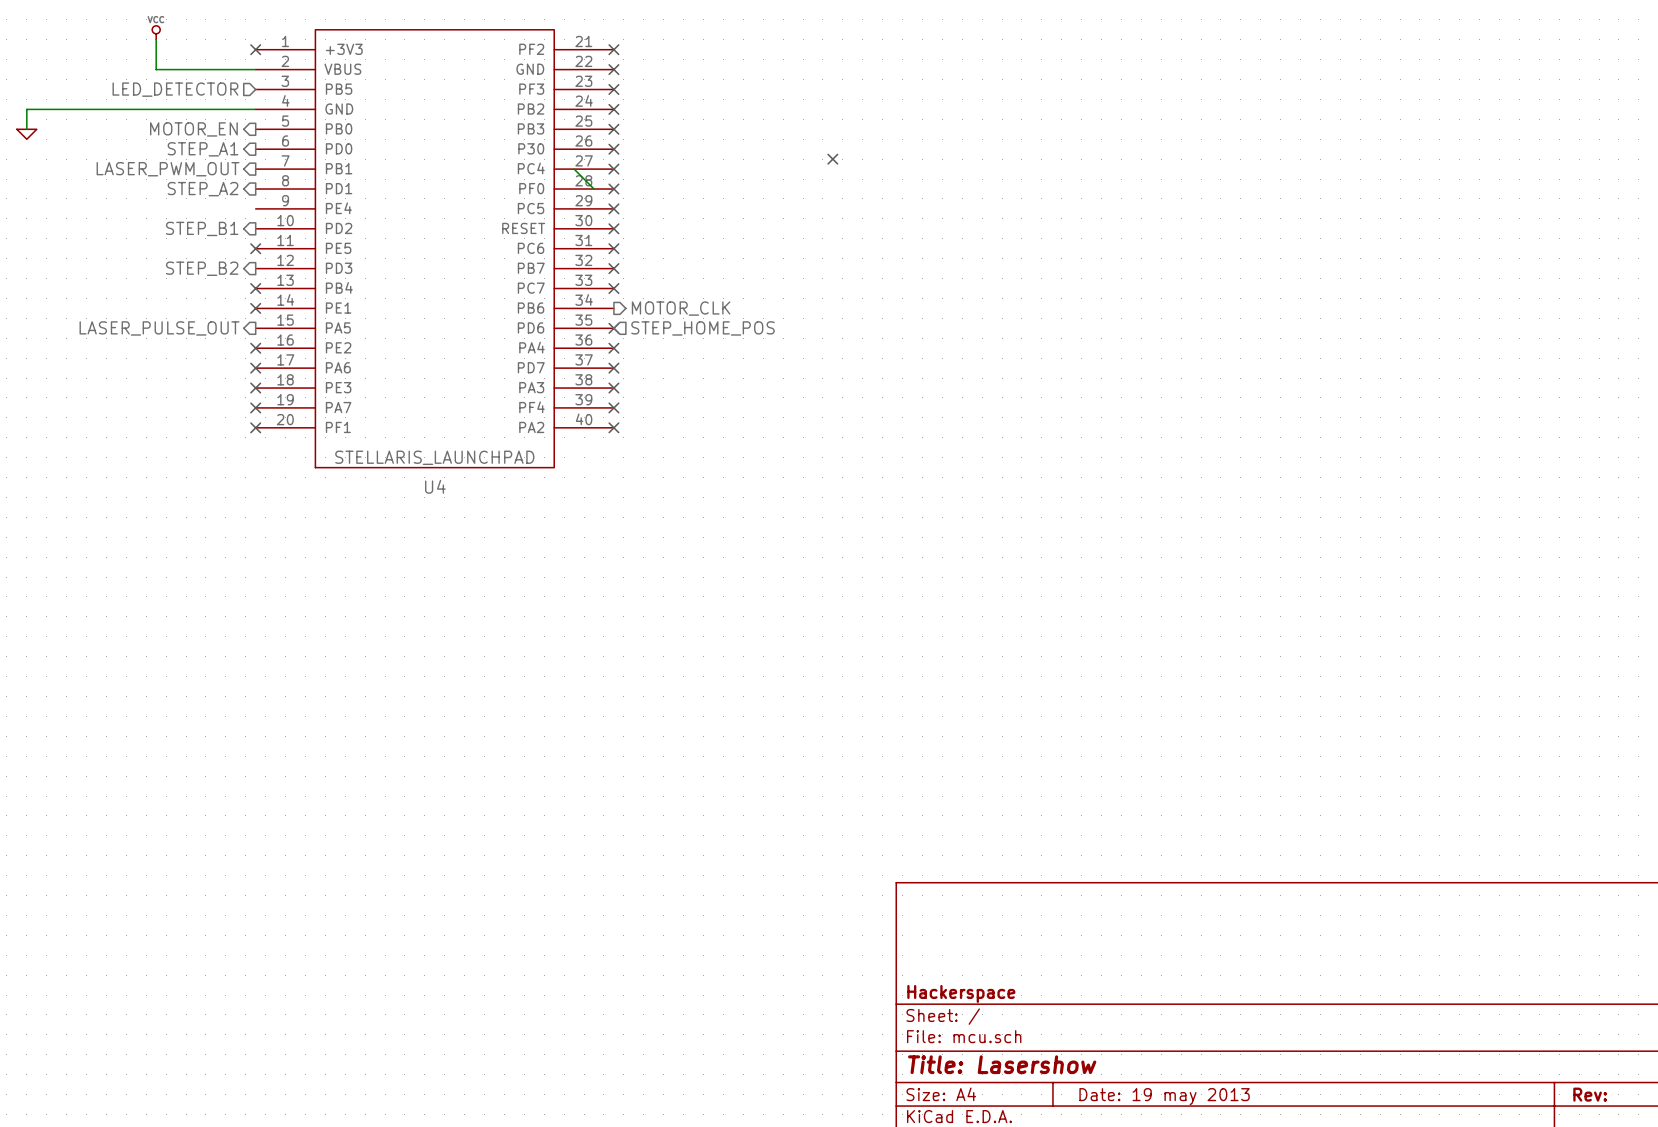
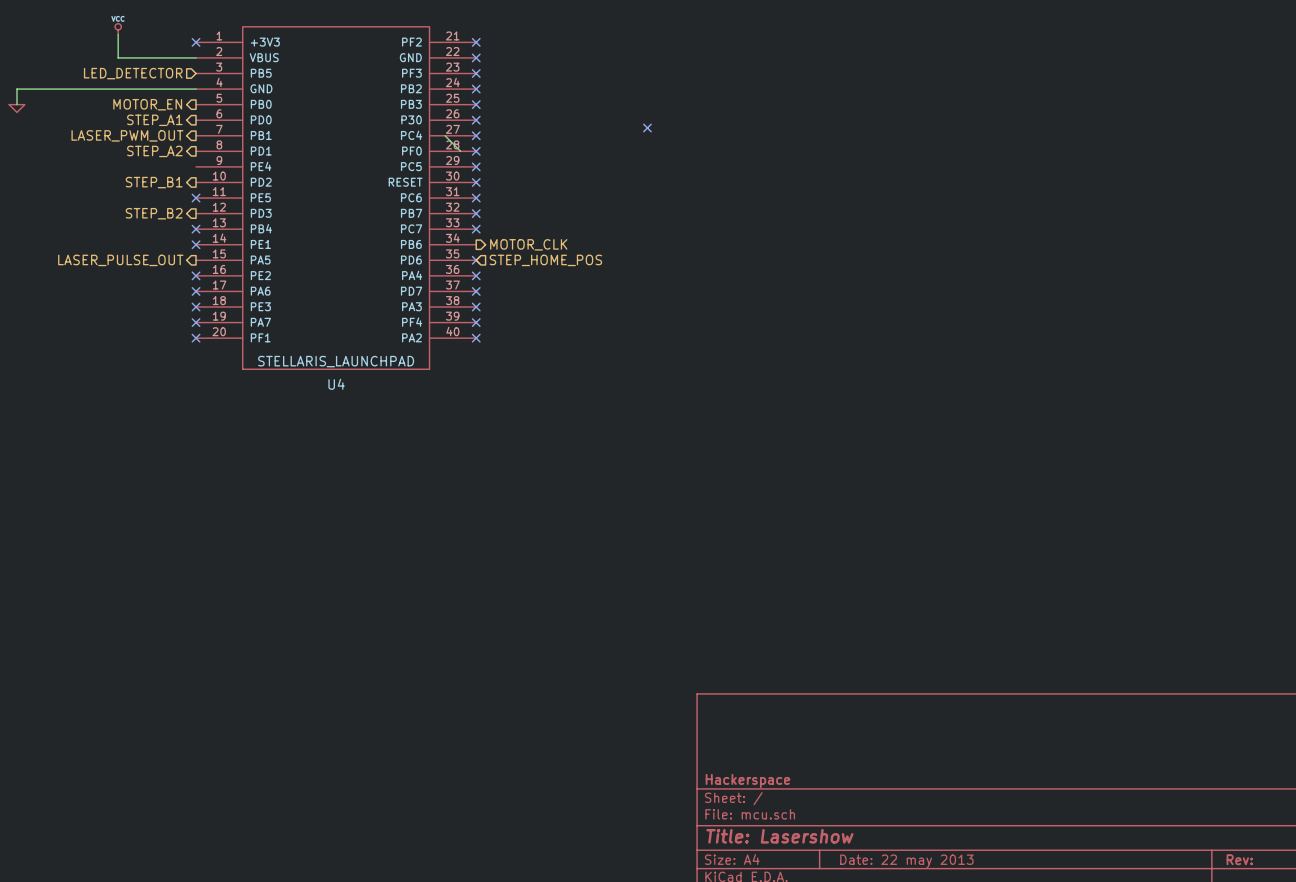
title block: Date: 19 may 2013 (1164, 1096) -> Date: 22 may 2013 (906, 861)

